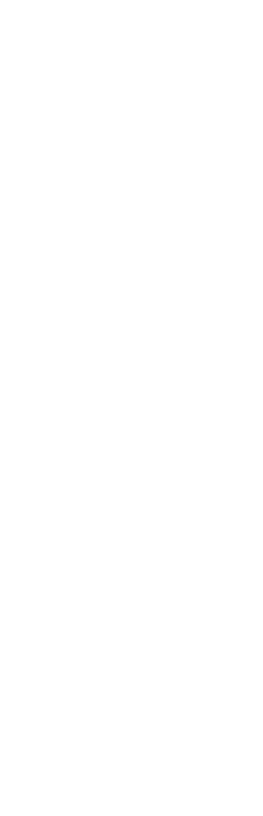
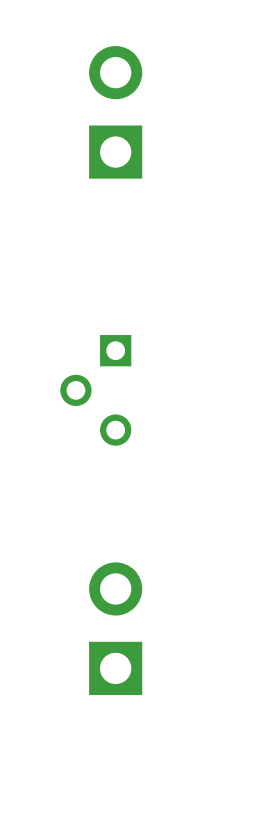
part: none -> (115, 112)
part: none -> (95, 390)
part: none -> (115, 628)

